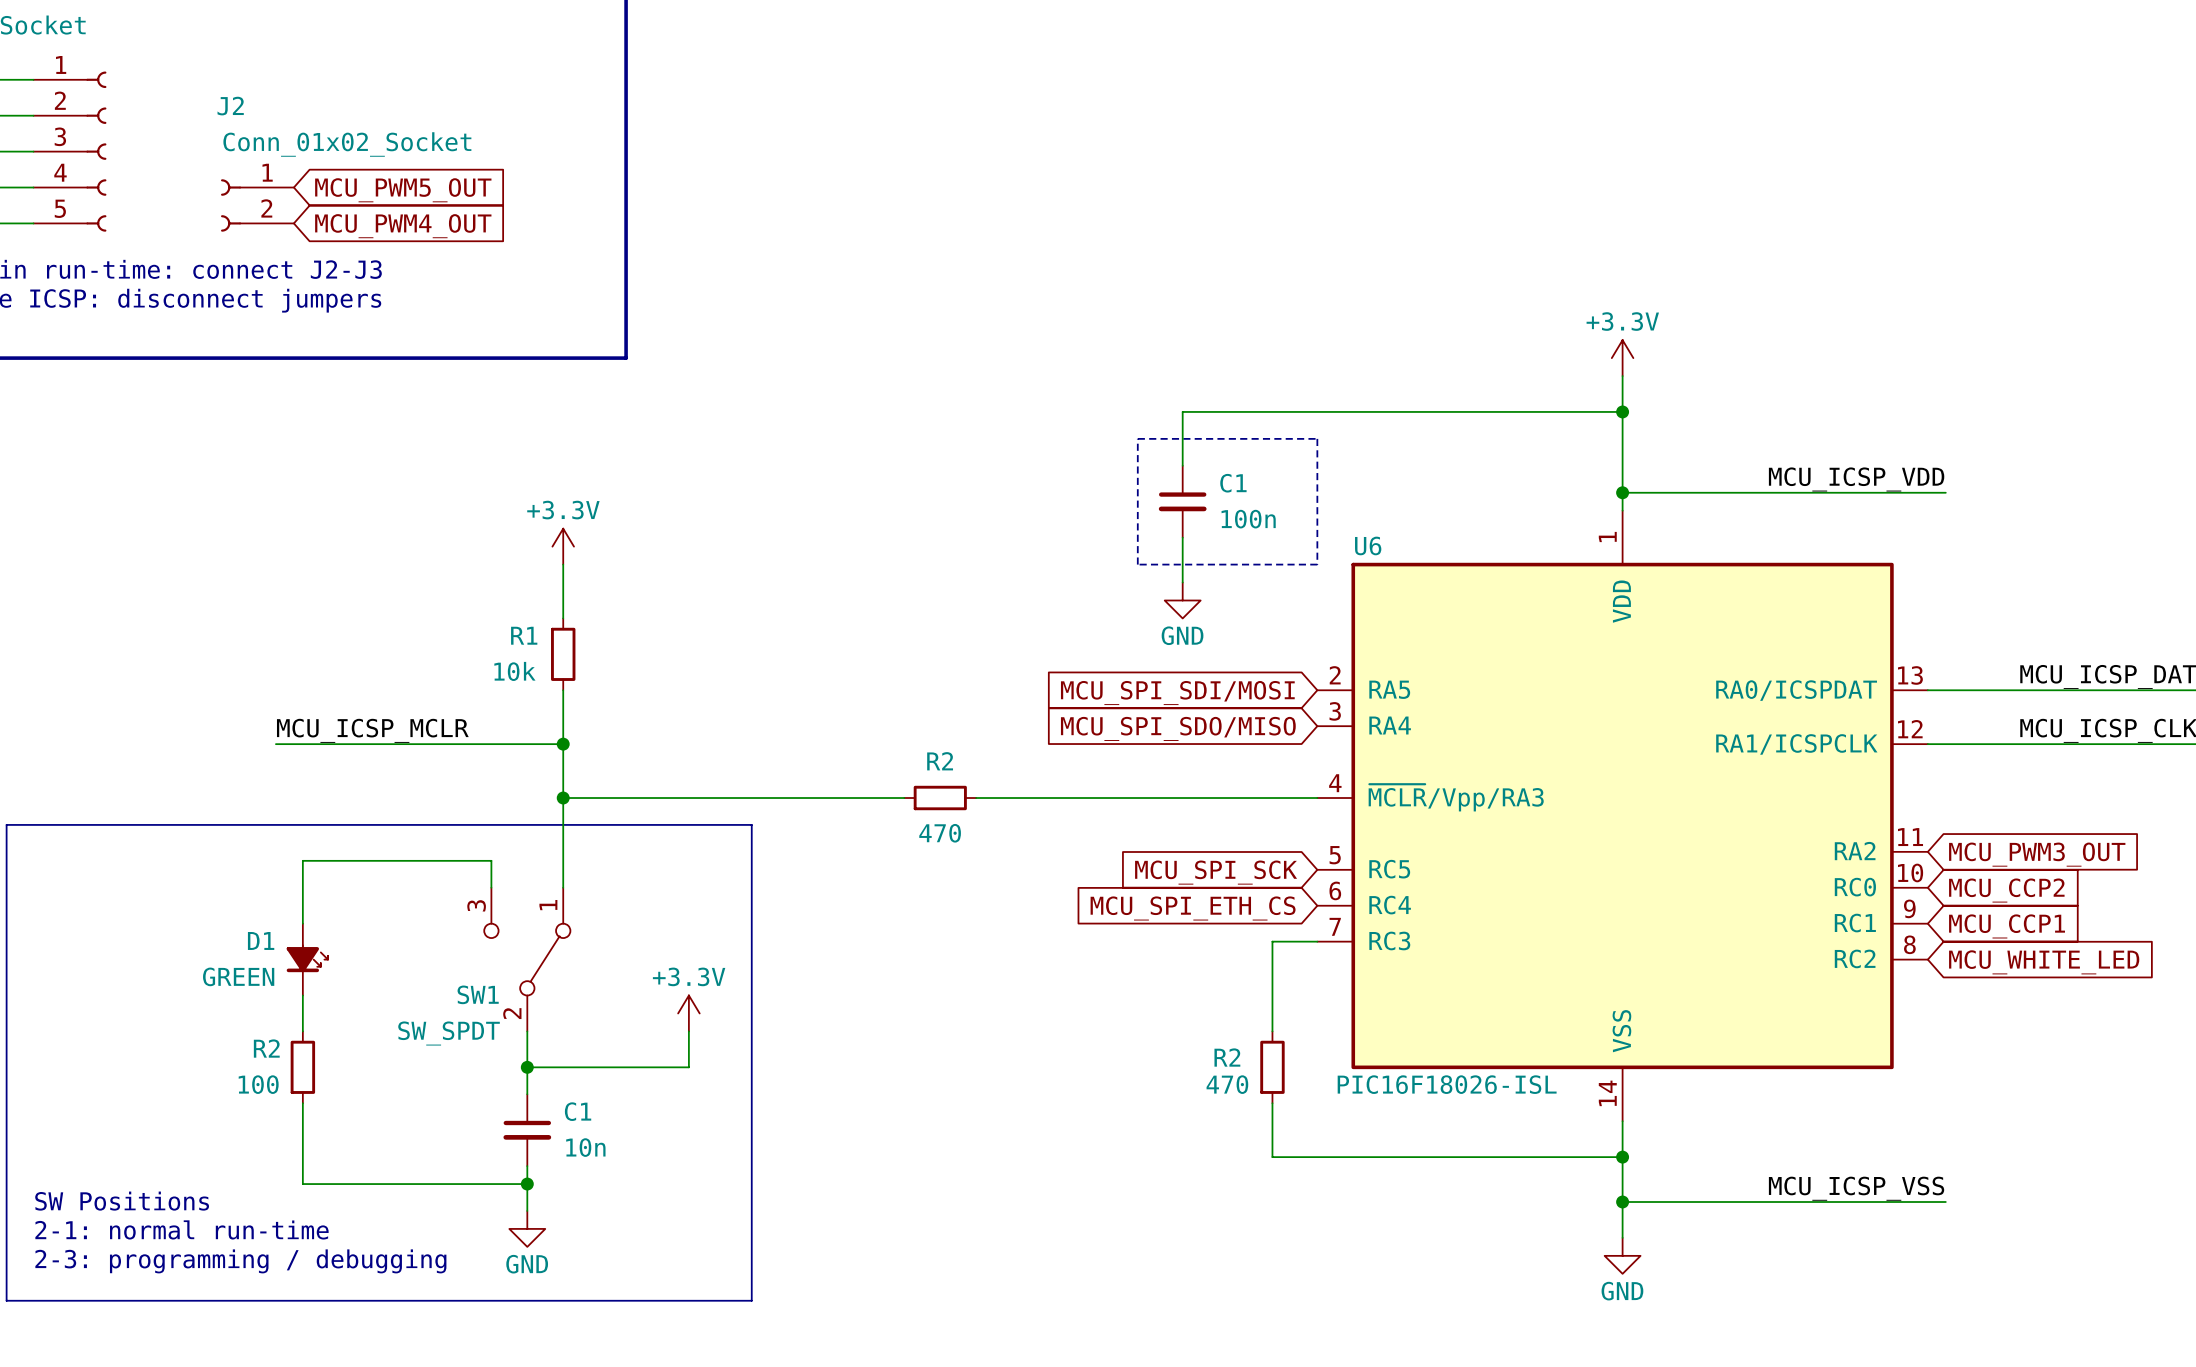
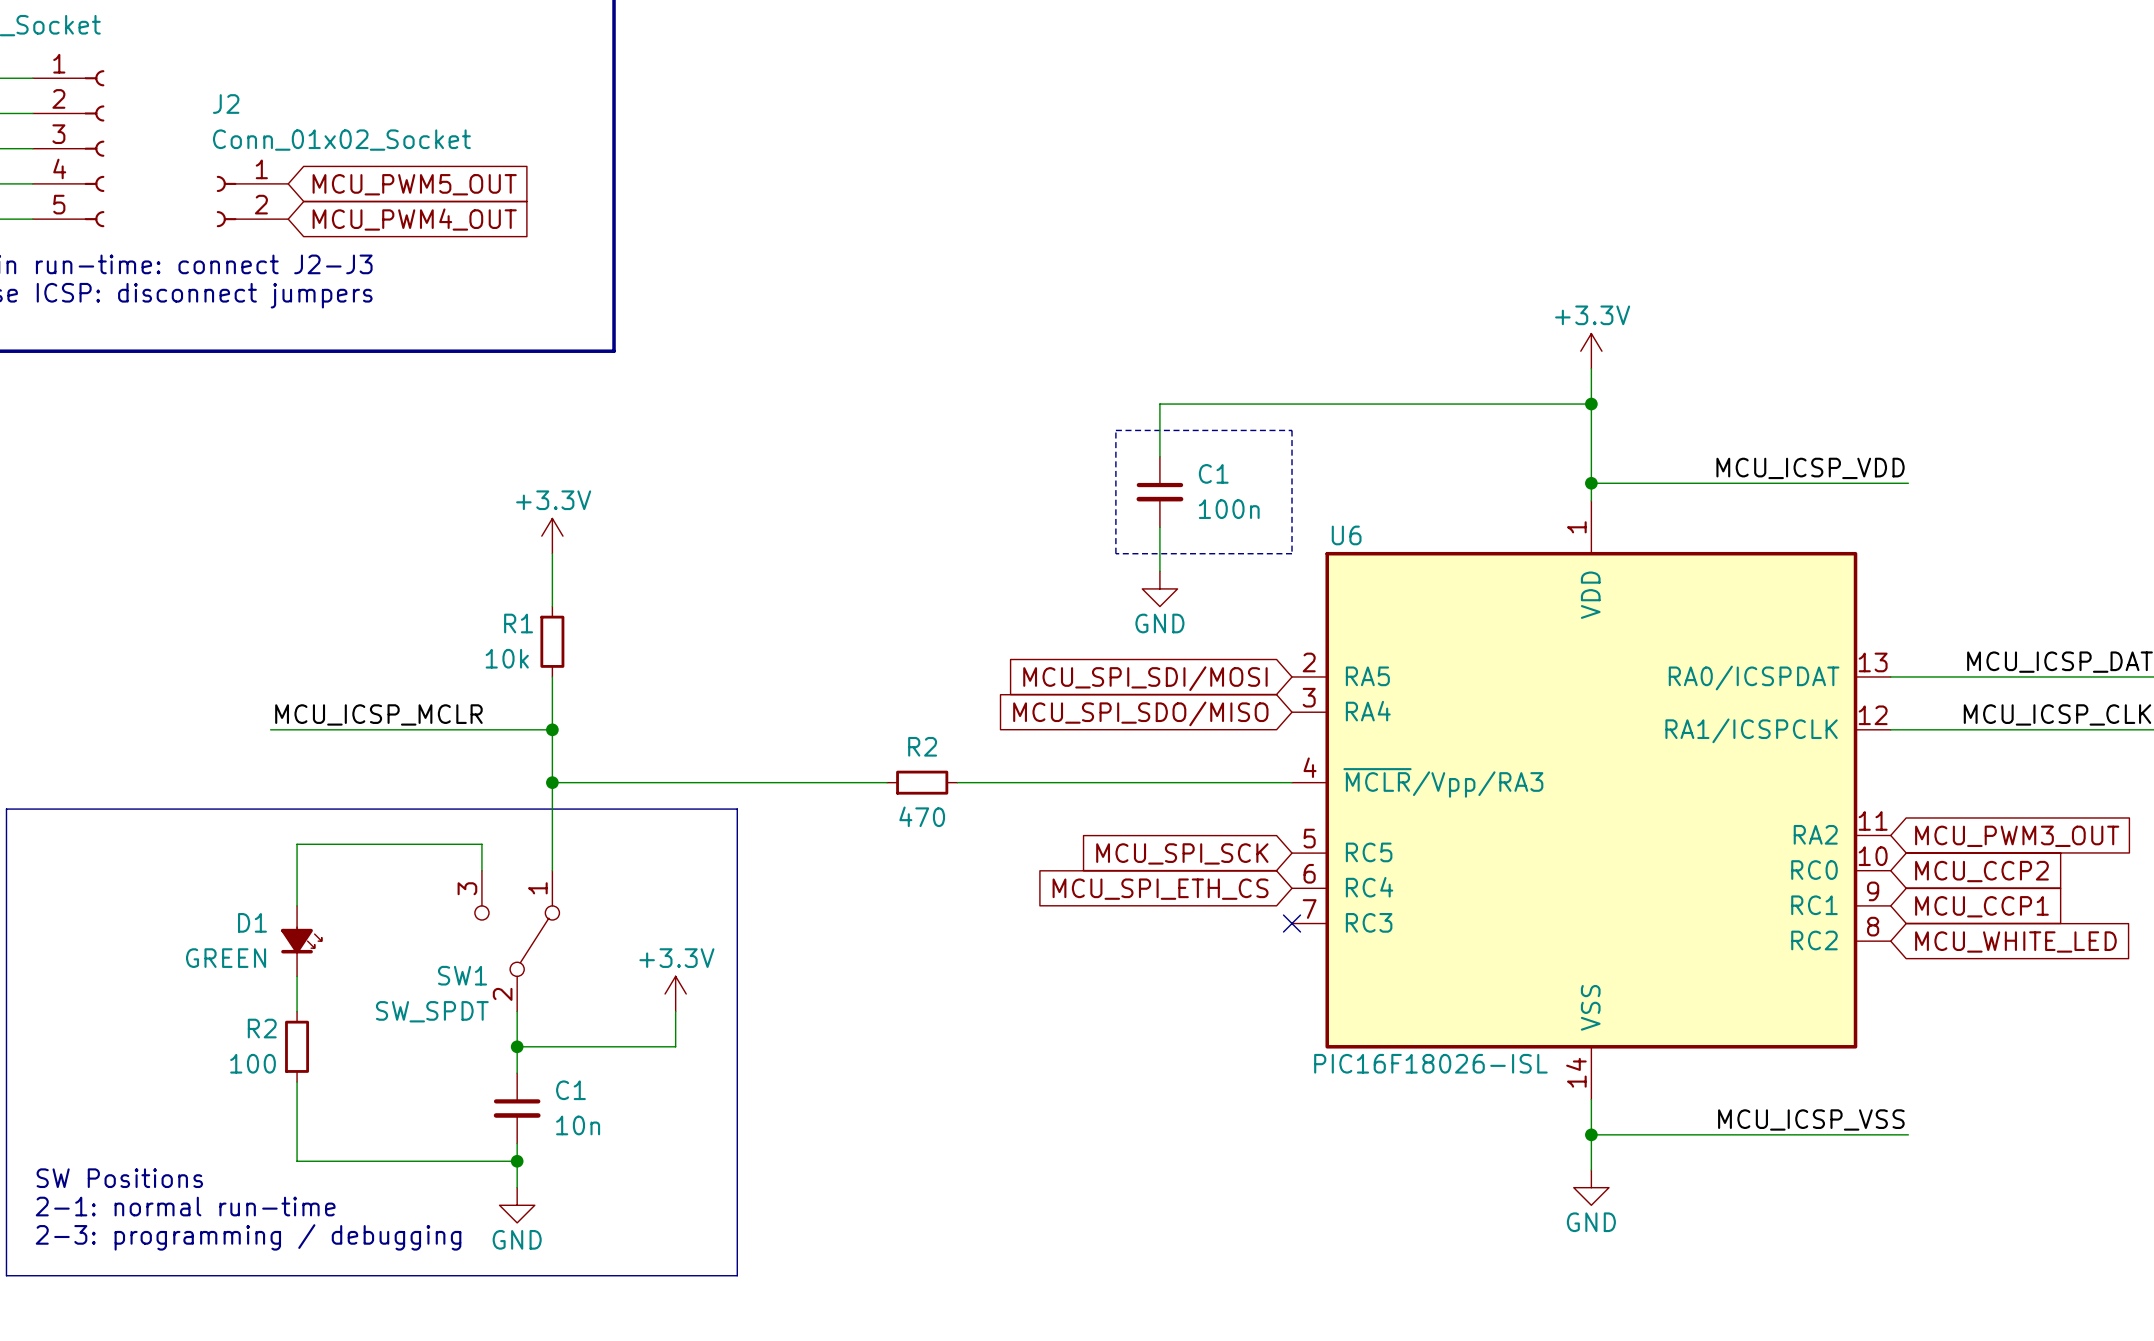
wire: (1317, 941) (1272, 941) (1272, 1031) -> none
no-connect mark: none -> (1292, 923)
R2: 470 (1272, 1067) -> none
wire: (1272, 1103) (1272, 1157) (1622, 1157) -> (1908, 1134) (1591, 1134)
label position: MCU_ICSP_VSS (1856, 1188) -> MCU_ICSP_VSS (1811, 1119)
wire: (1622, 1193) (1622, 1237) -> none
wire: (1622, 1202) (1945, 1202) -> none
junction: (1622, 1202) -> none
power symbol position: GND (1622, 1255) -> GND (1591, 1187)

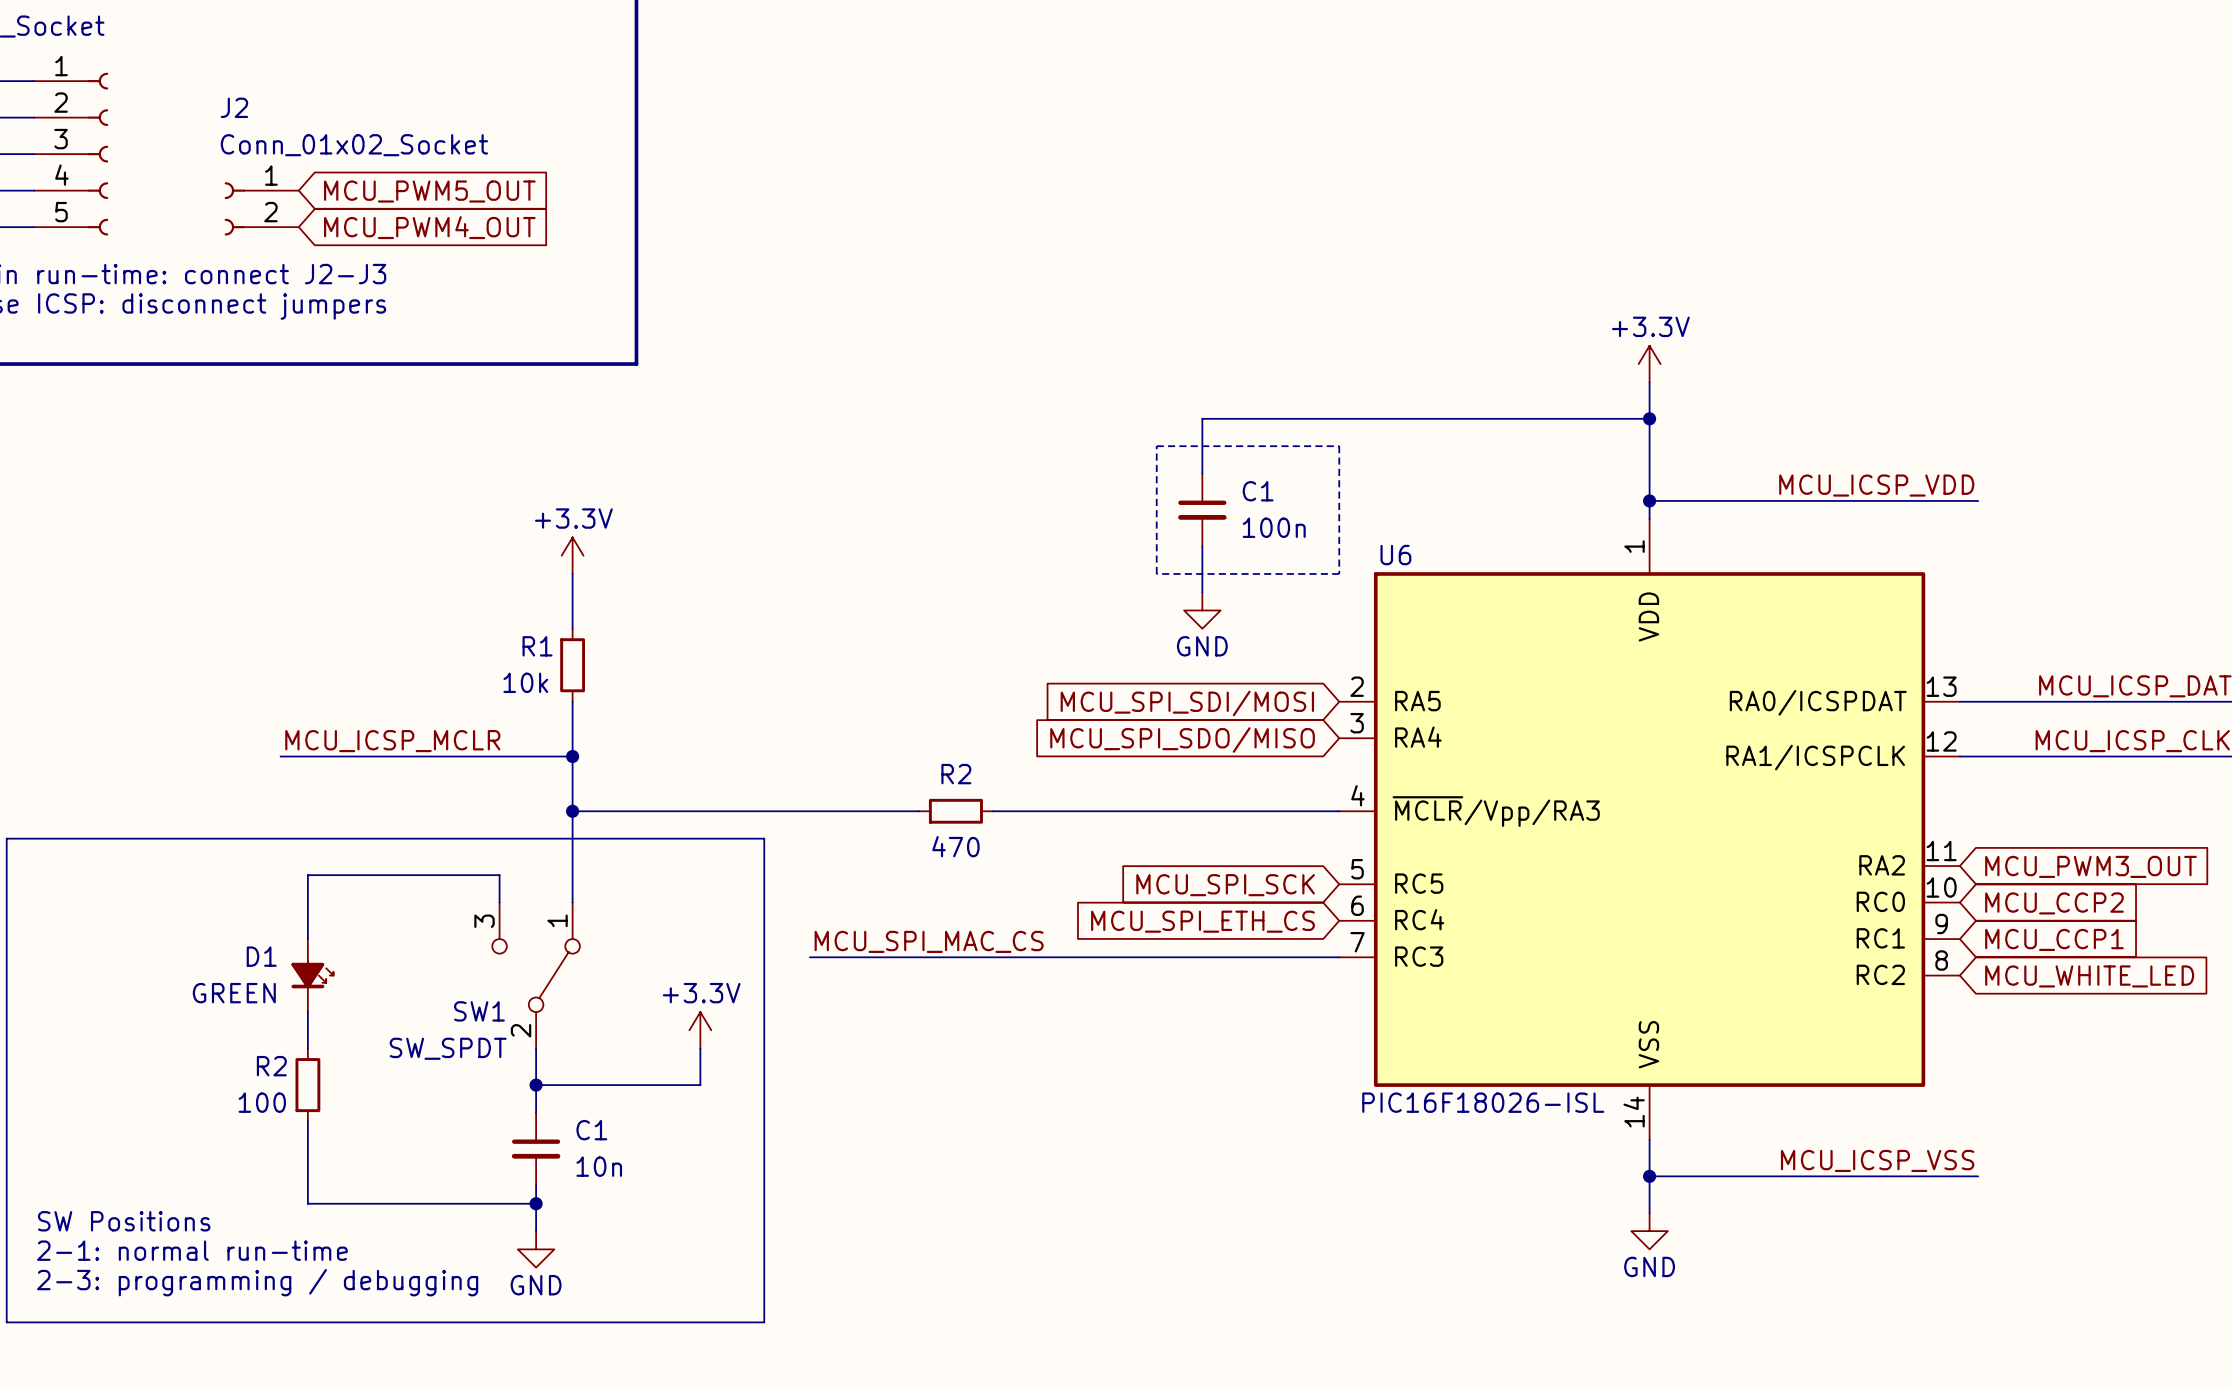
label: none -> MCU_SPI_MAC_CS (929, 941)
wire: none -> (809, 957) (1339, 957)
no-connect mark: (1292, 923) -> none

